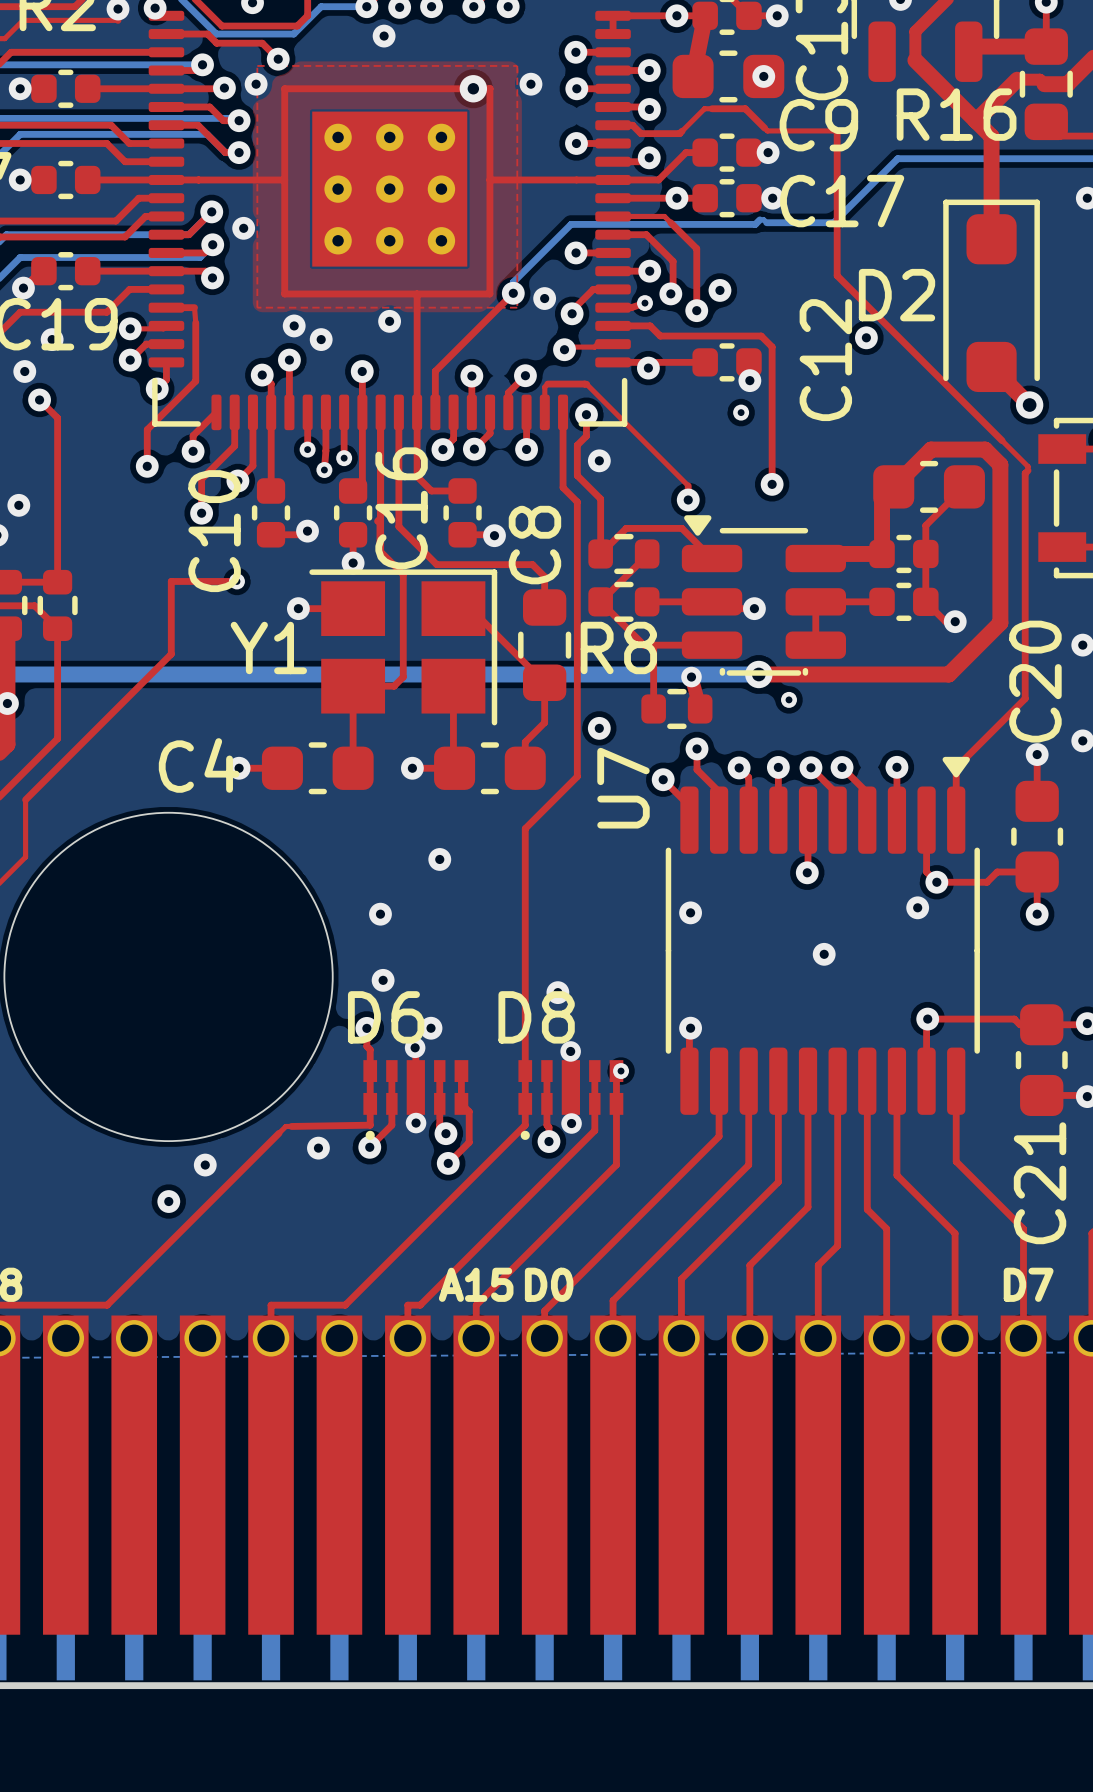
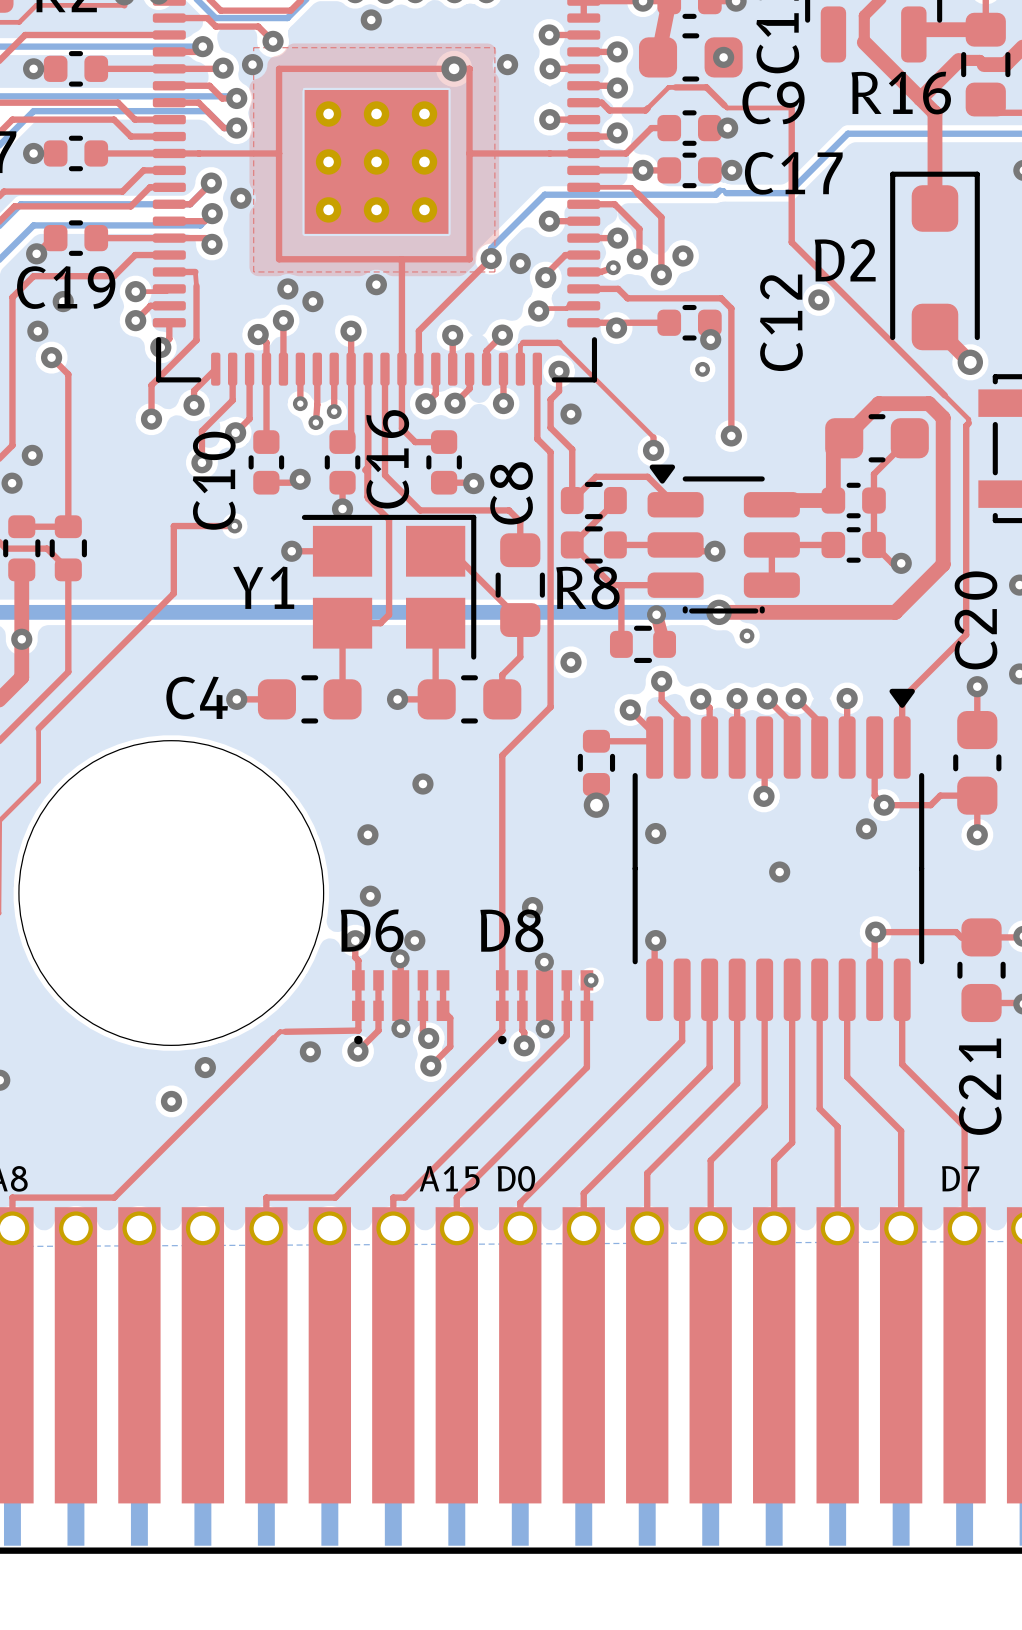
U7 name: U7 (623, 788) -> none
top track: none -> (596, 741) (654, 741)
part: none -> (596, 762)
via: none -> (596, 805)

